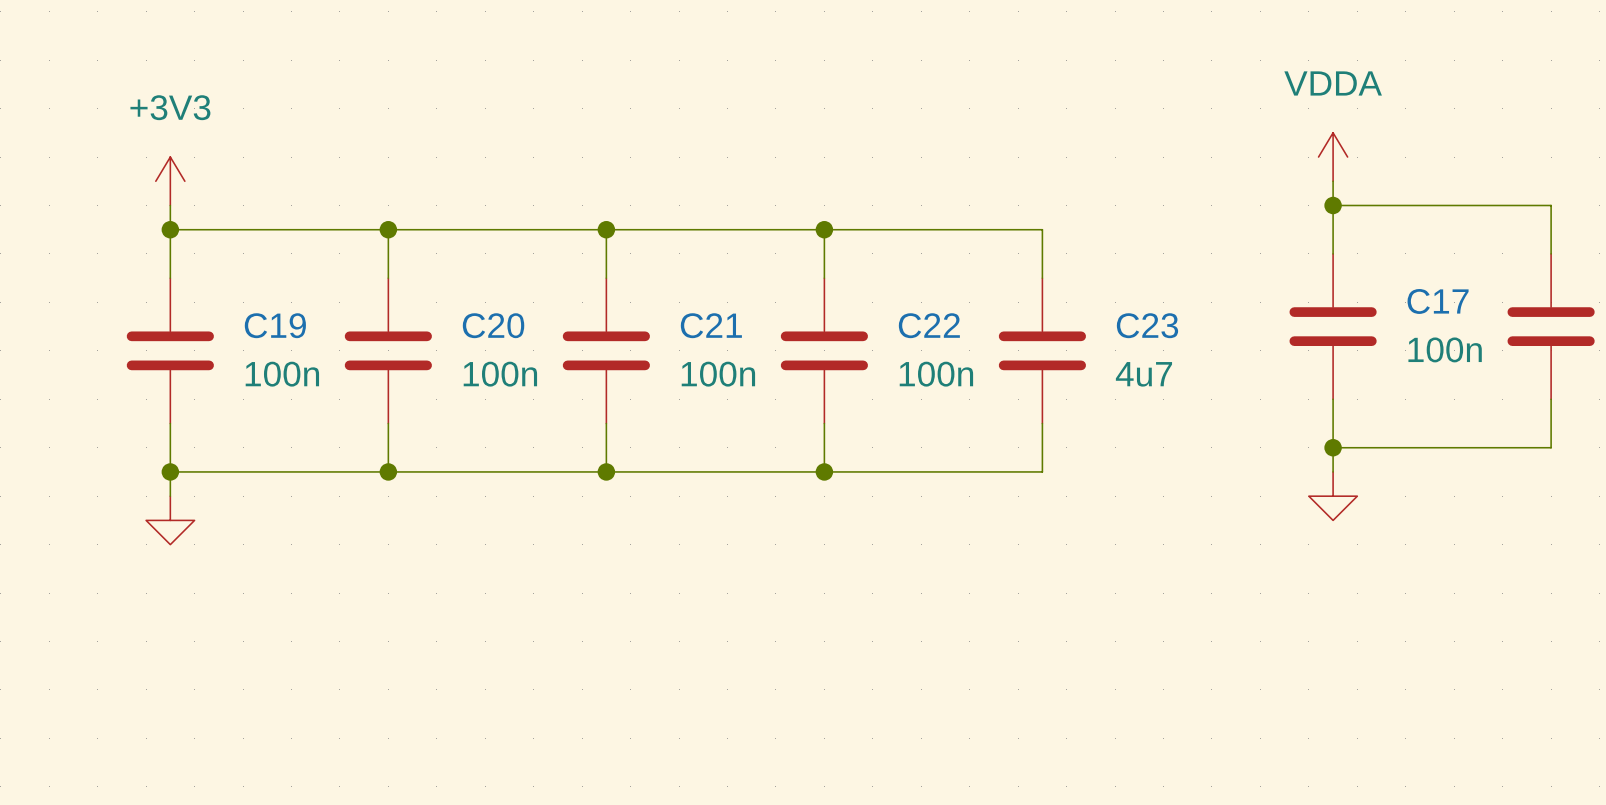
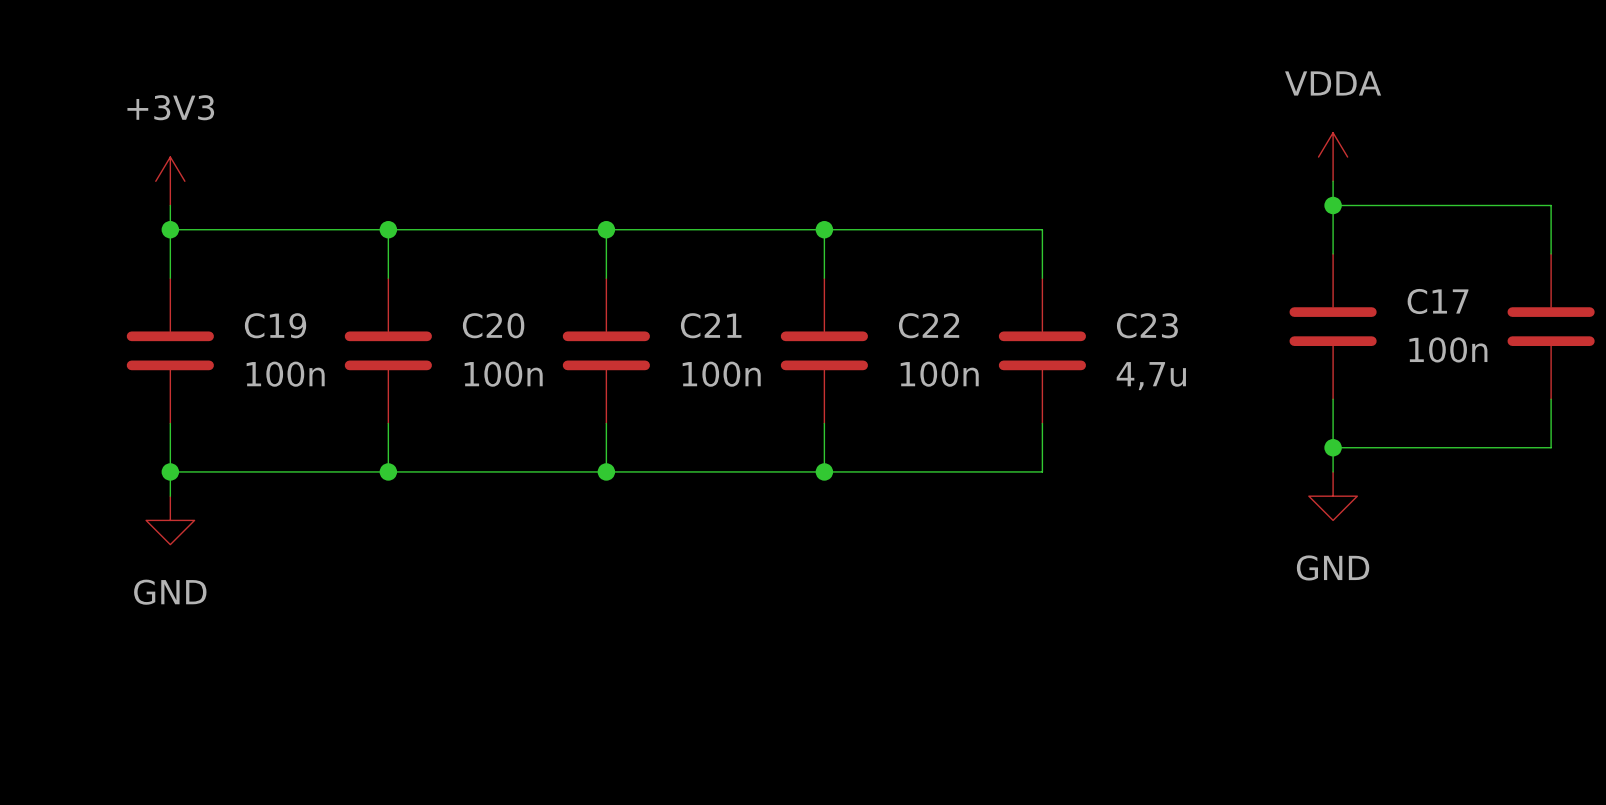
C23 value: 4u7 (1143, 374) -> 4,7u (1151, 376)
power symbol text: none -> GND (1333, 567)
power symbol text: none -> GND (170, 592)

